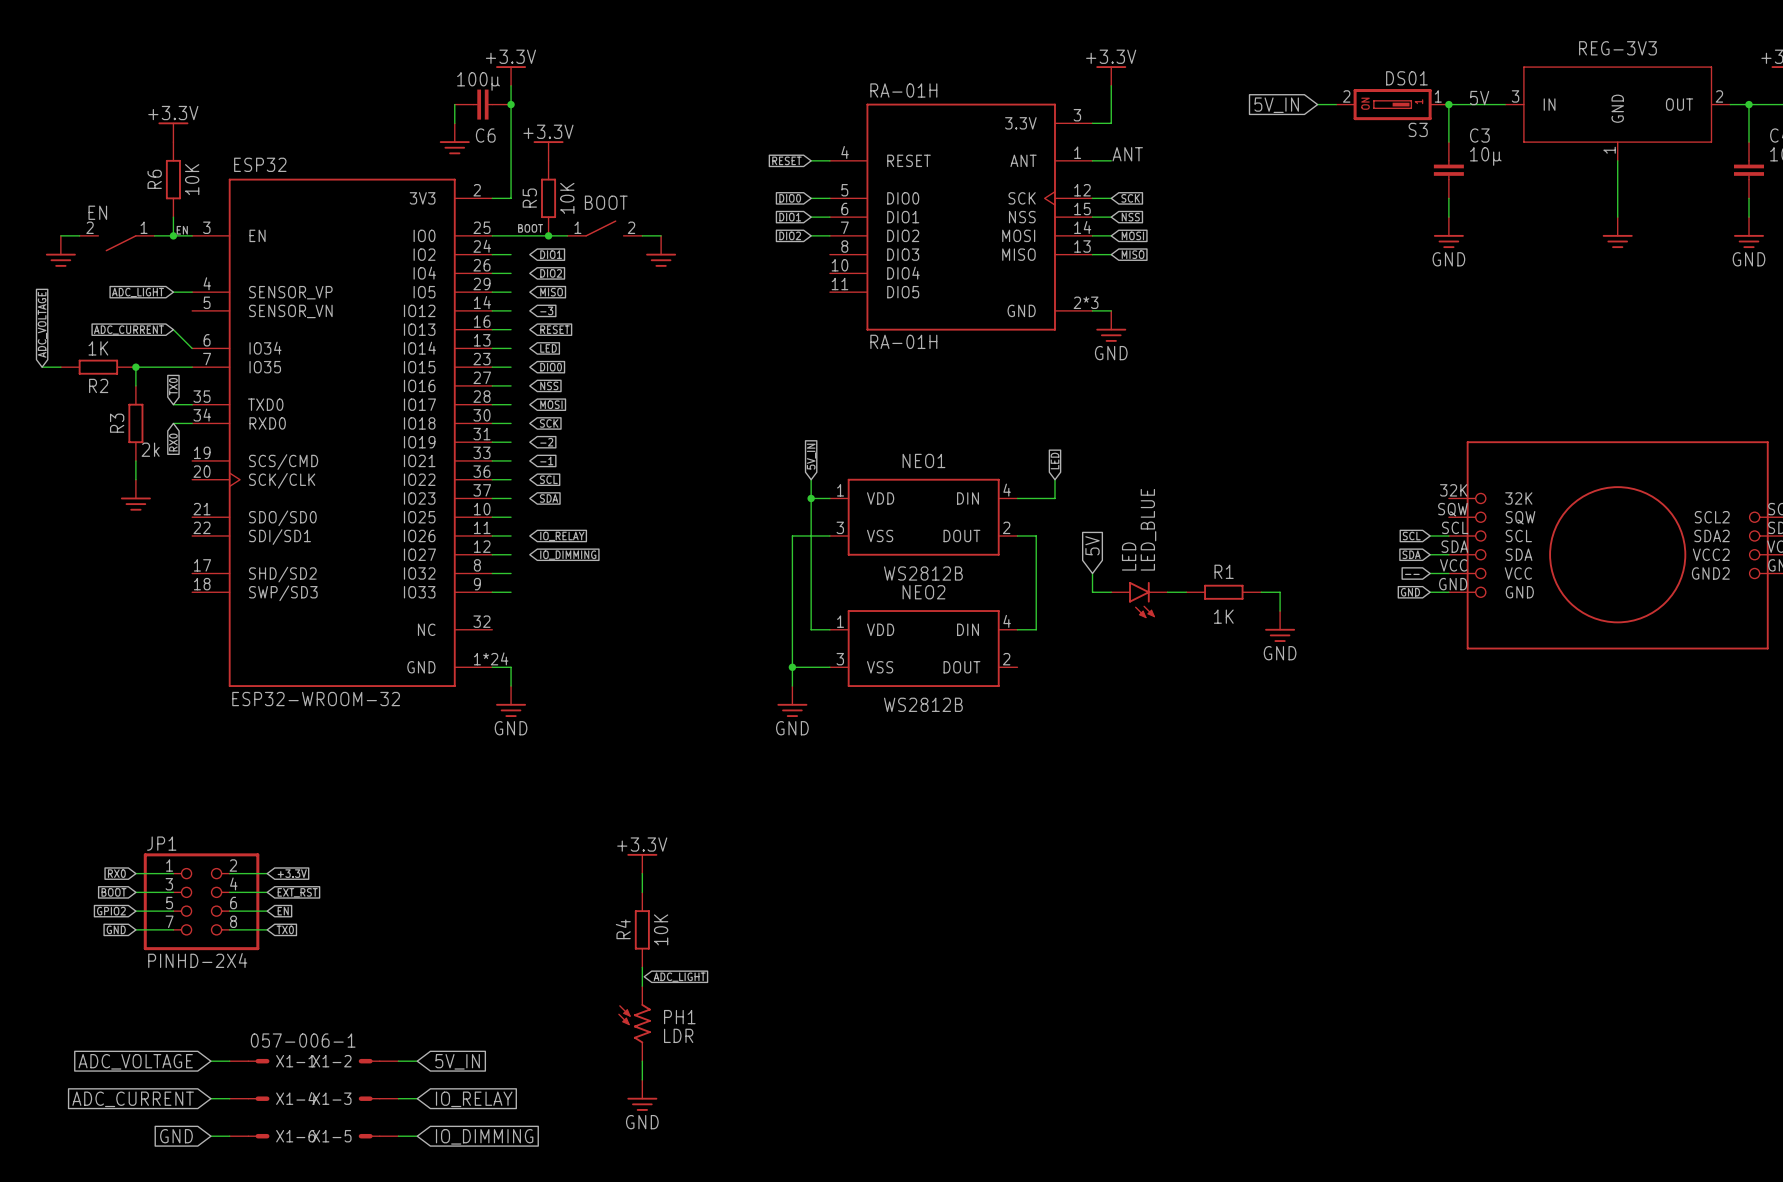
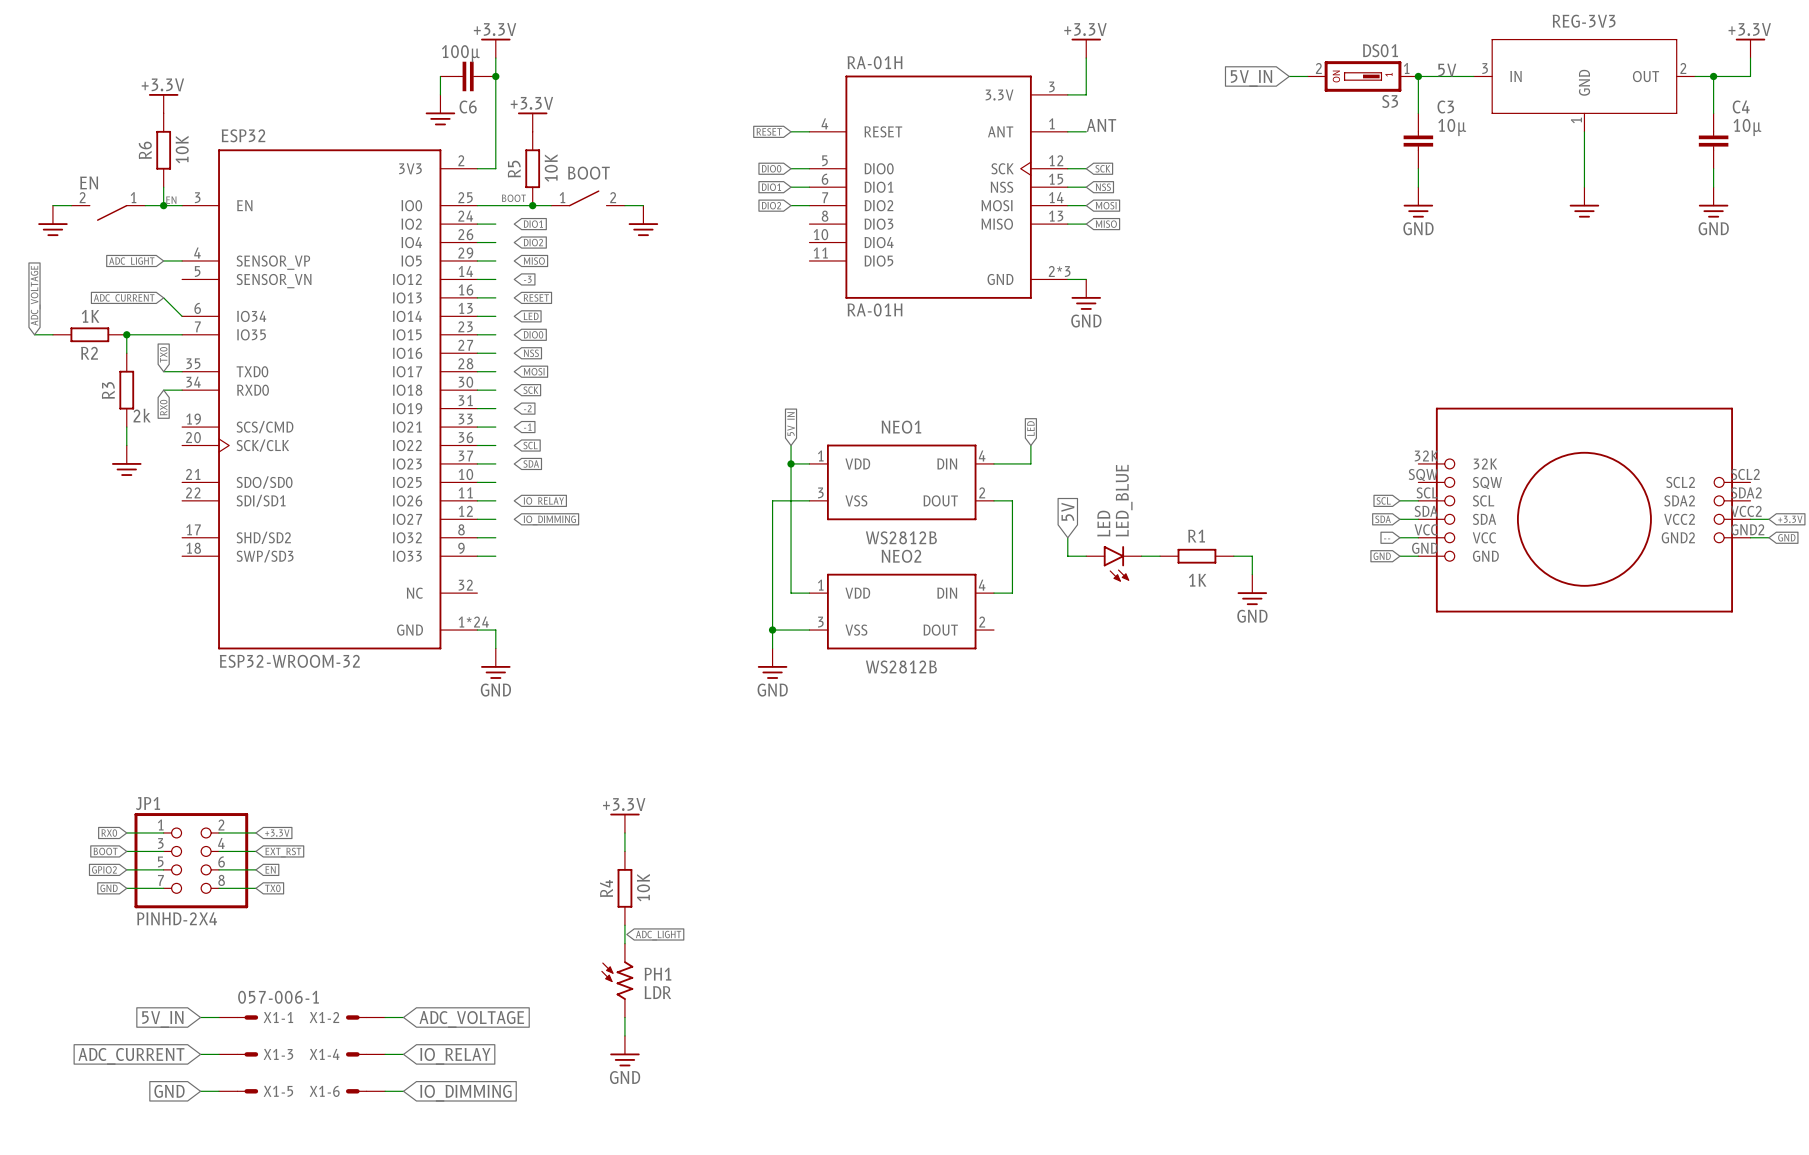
global label: ADC_VOLTAGE (135, 1061) -> 5V_IN (162, 1019)
global label: 5V_IN (457, 1061) -> ADC_VOLTAGE (471, 1019)
X1-4 name: X1-4 (296, 1098) -> X1-3 (278, 1054)
X1-3 name: X1-3 (331, 1098) -> X1-4 (324, 1054)
X1-6 name: X1-6 (295, 1136) -> X1-5 (278, 1091)
X1-5 name: X1-5 (331, 1136) -> X1-6 (324, 1091)

